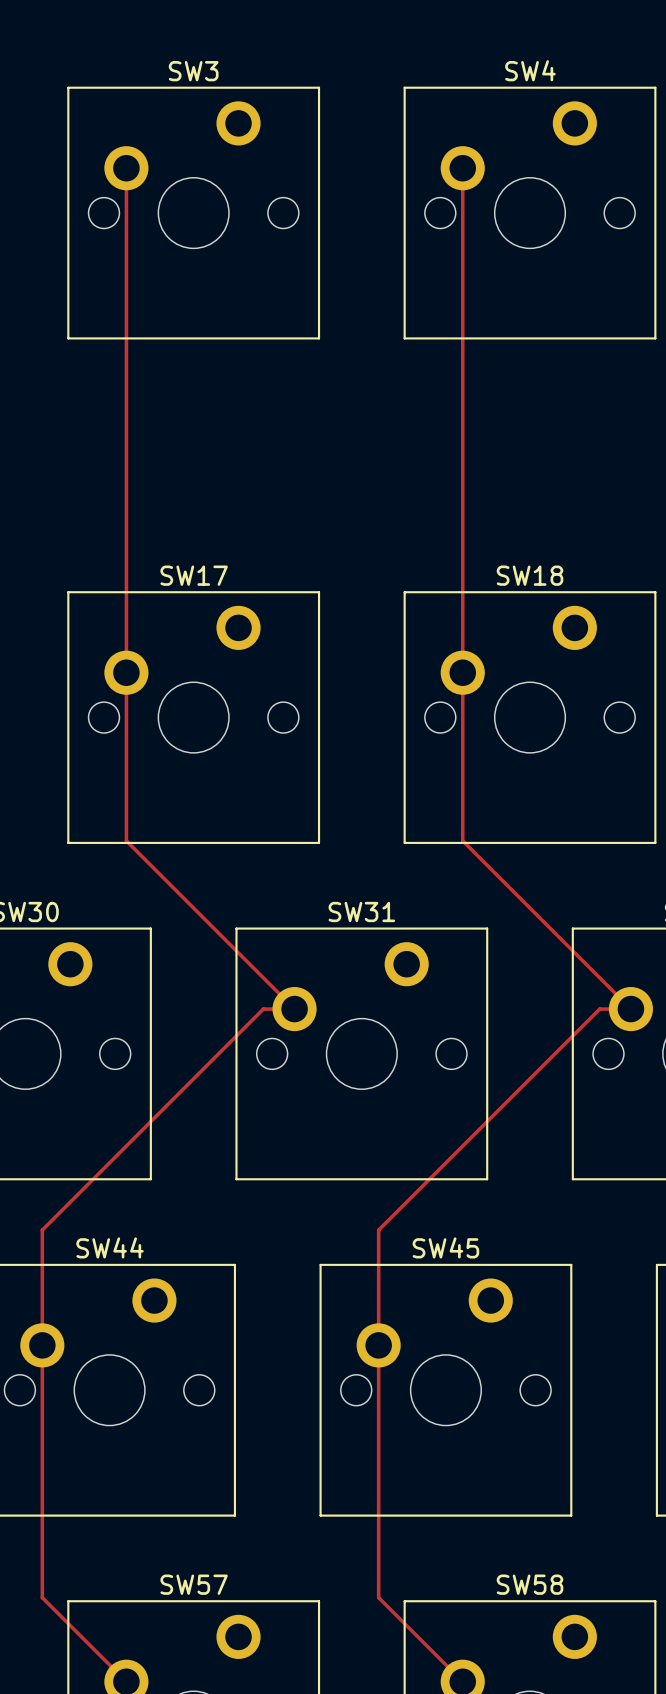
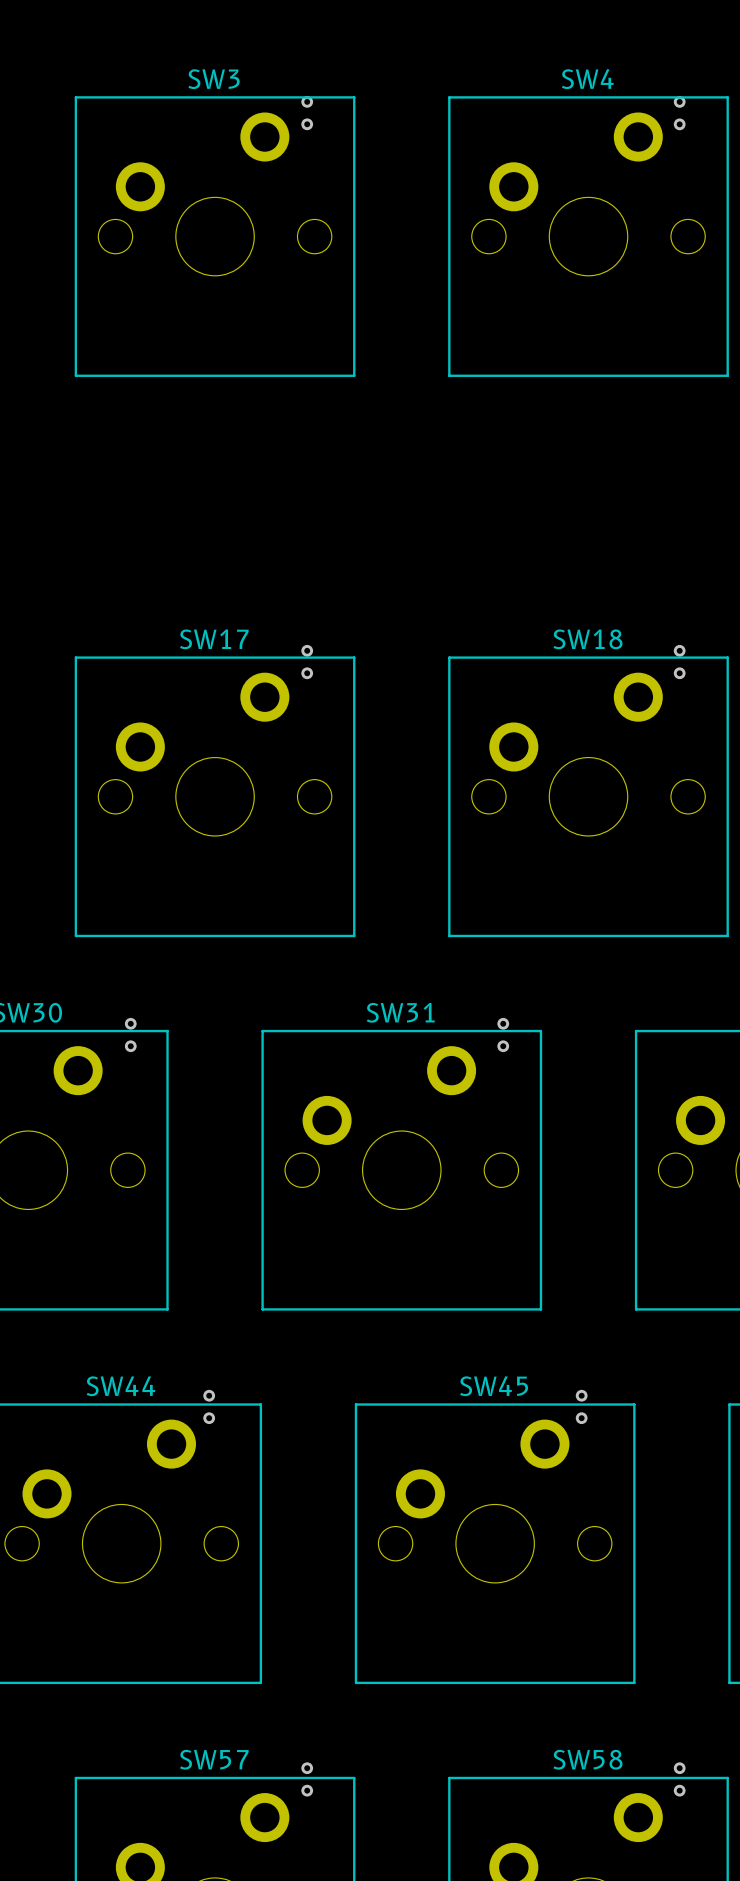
via: none -> (307, 101)
via: none -> (679, 101)
via: none -> (307, 124)
via: none -> (679, 124)
track: (126, 168) (126, 840) (294, 1009) (263, 1009) (42, 1230) (42, 1597) (126, 1681) -> none
track: (462, 168) (462, 840) (630, 1009) (599, 1009) (378, 1230) (378, 1597) (462, 1681) -> none
via: none -> (307, 650)
via: none -> (679, 650)
via: none -> (307, 673)
via: none -> (679, 673)
via: none -> (130, 1023)
via: none -> (503, 1023)
via: none -> (130, 1046)
via: none -> (503, 1046)
via: none -> (209, 1395)
via: none -> (581, 1395)
via: none -> (209, 1418)
via: none -> (581, 1418)
via: none -> (307, 1768)
via: none -> (679, 1768)
via: none -> (307, 1790)
via: none -> (679, 1790)

